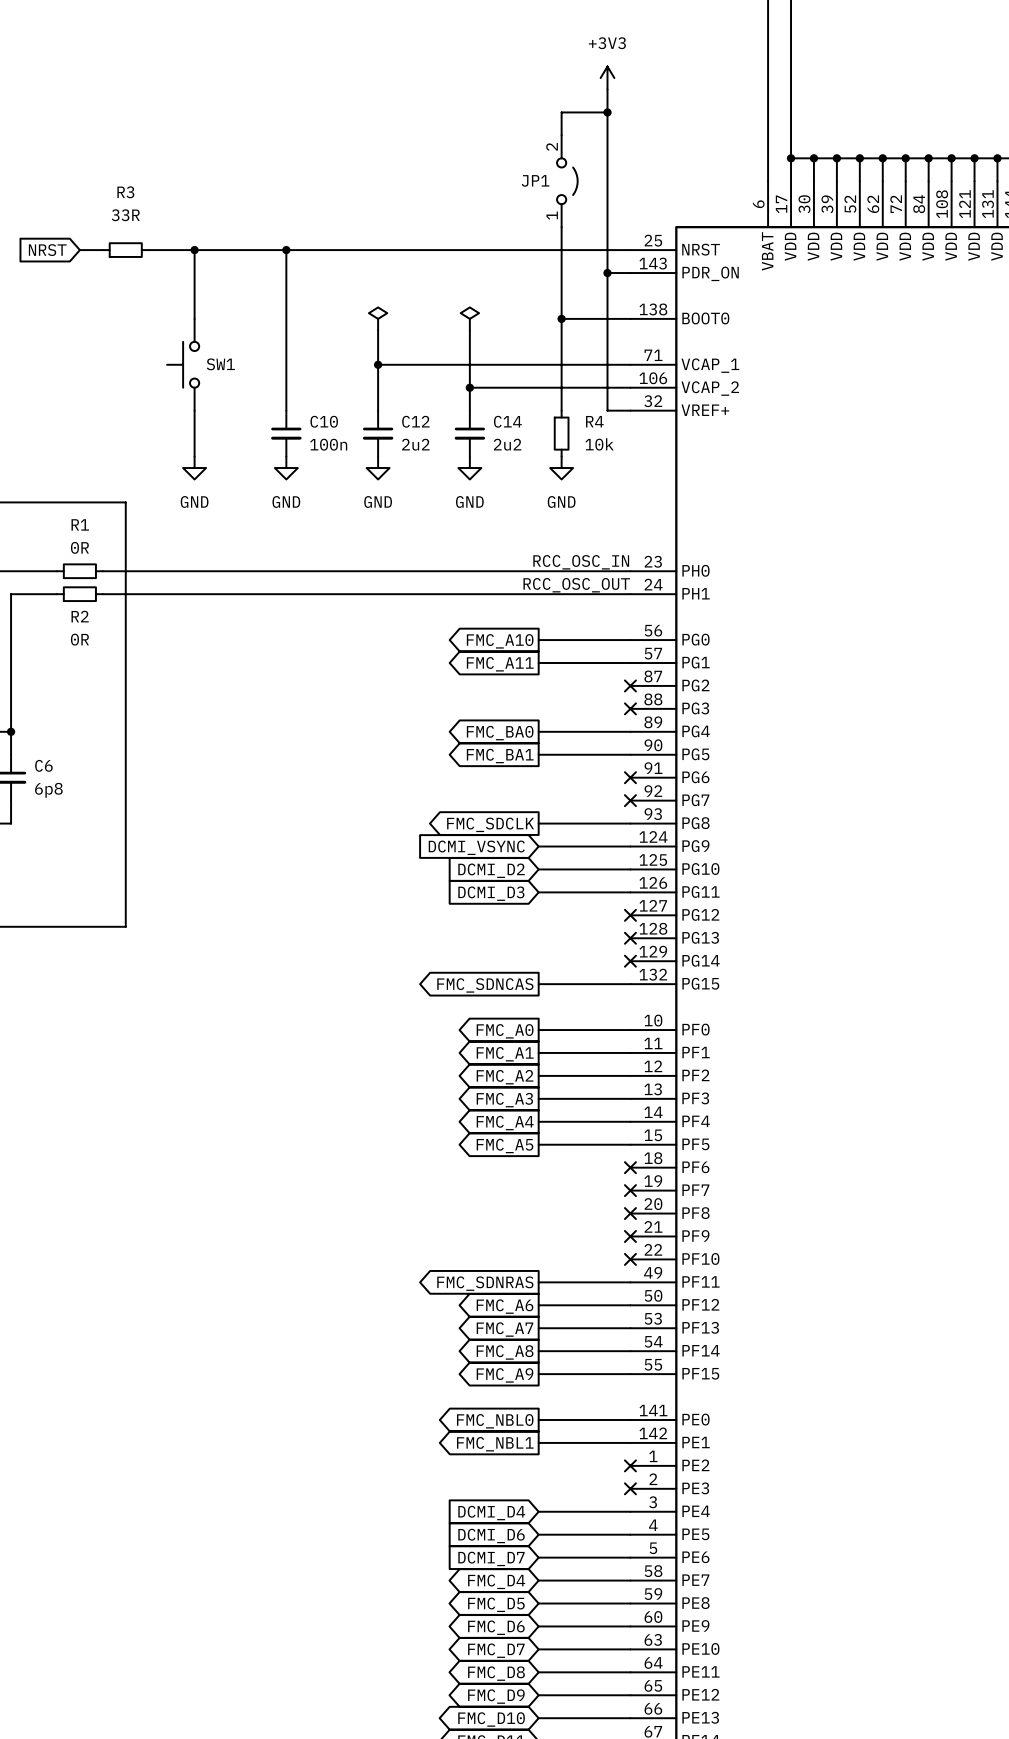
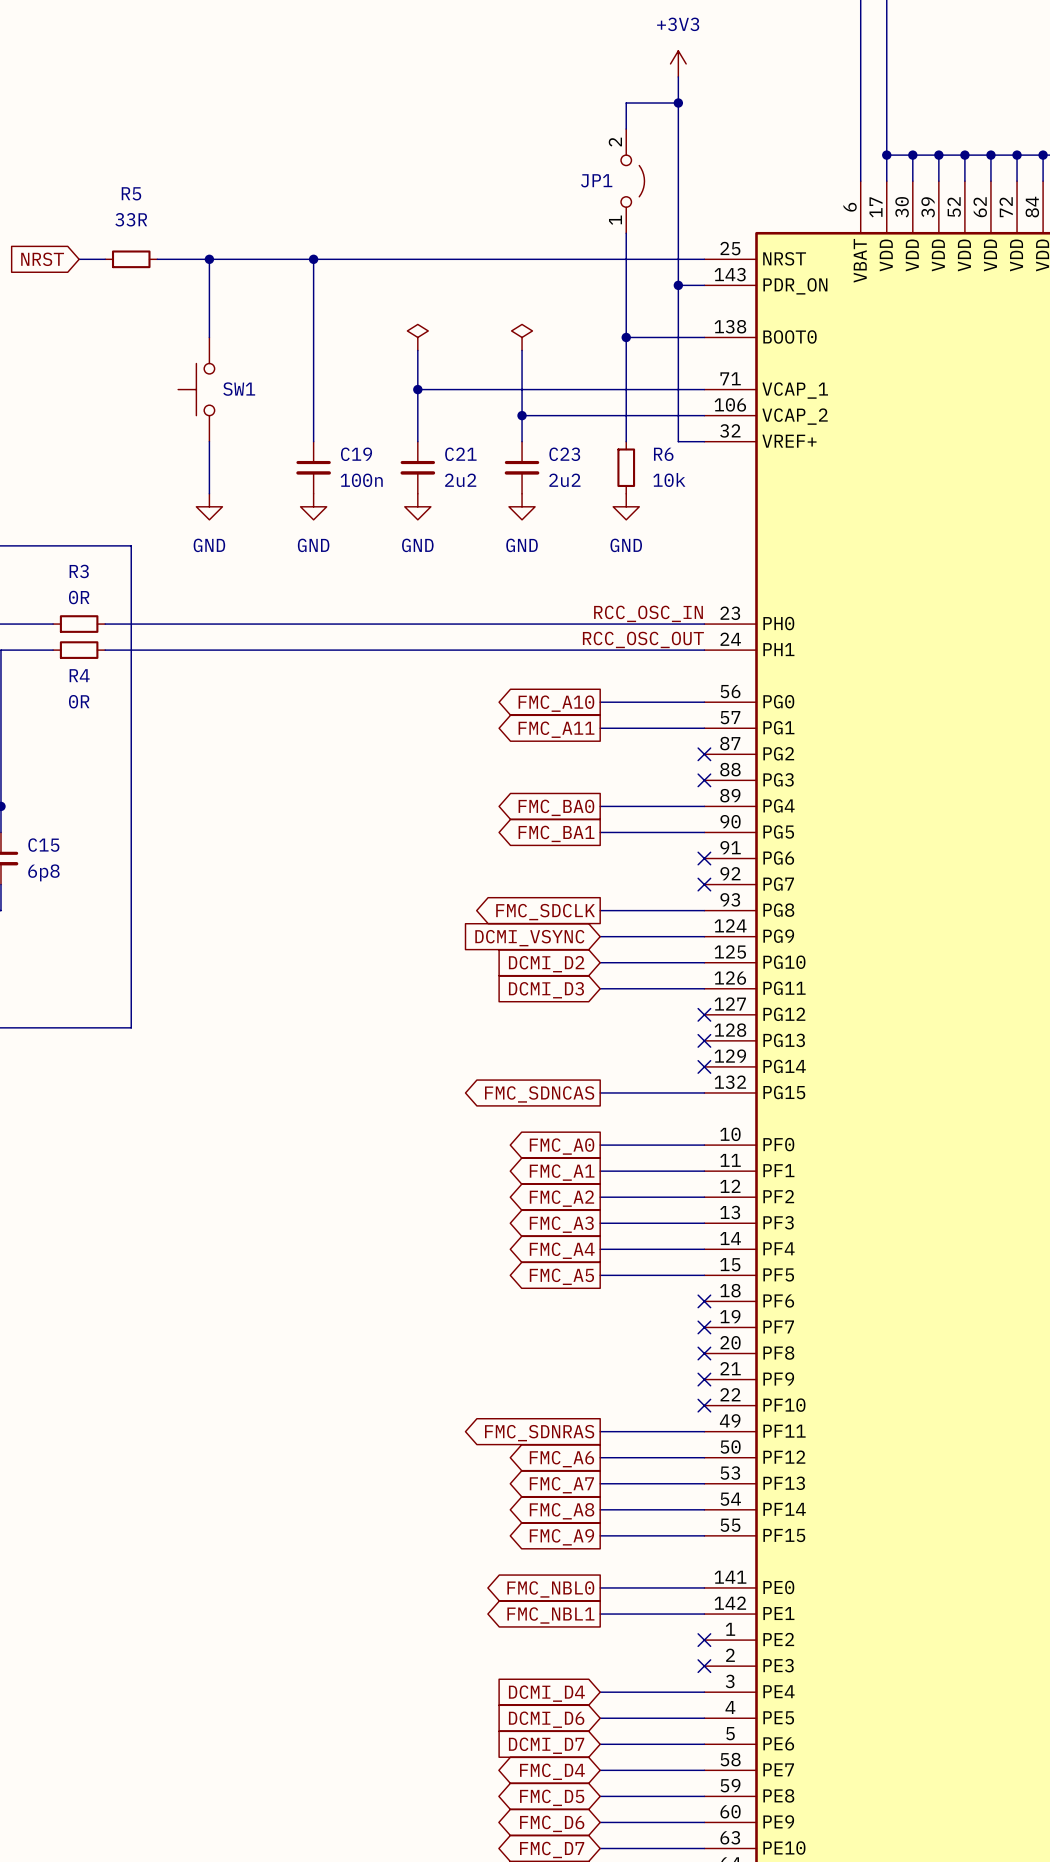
R3 name: R3 (125, 192) -> R5 (131, 193)
C10 name: C10 (324, 421) -> C19 (356, 454)
C12 name: C12 (415, 421) -> C21 (460, 454)
C14 name: C14 (507, 421) -> C23 (564, 454)
R4 name: R4 (594, 421) -> R6 (663, 454)
R1 name: R1 (80, 524) -> R3 (79, 571)
R2 name: R2 (80, 616) -> R4 (79, 675)
C6 name: C6 (43, 765) -> C15 (43, 845)

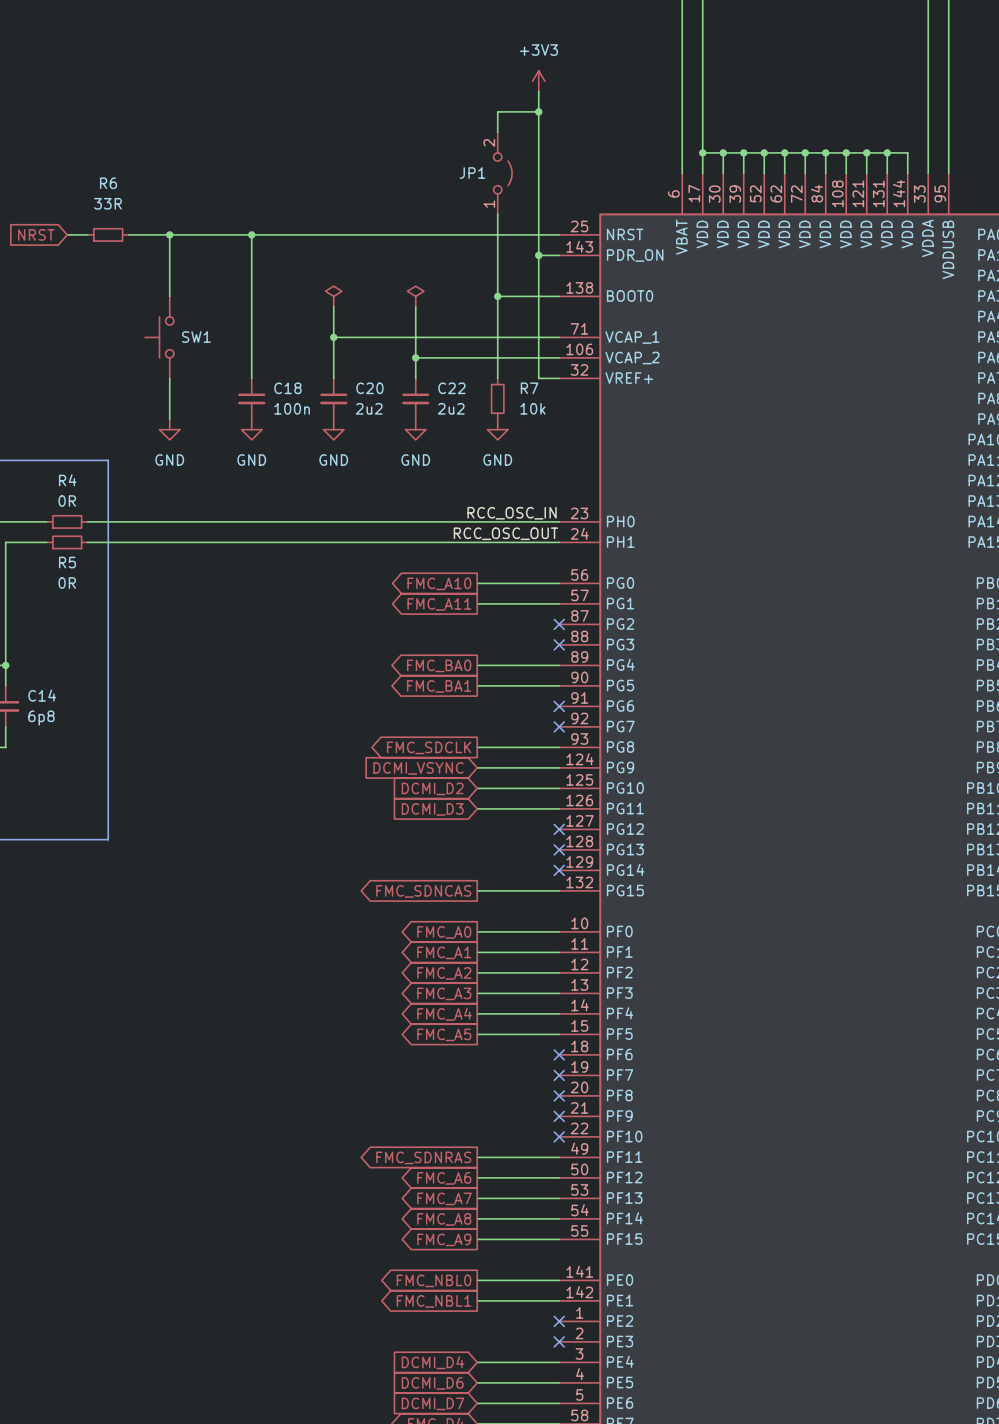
R5 name: R5 (131, 193) -> R6 (108, 183)
C19 name: C19 (356, 454) -> C18 (287, 388)
C21 name: C21 (460, 454) -> C20 (369, 388)
C23 name: C23 (564, 454) -> C22 (451, 388)
R6 name: R6 (663, 454) -> R7 (529, 388)
R3 name: R3 (79, 571) -> R4 (67, 480)
R4 name: R4 (79, 675) -> R5 (67, 562)
C15 name: C15 (43, 845) -> C14 (42, 695)

